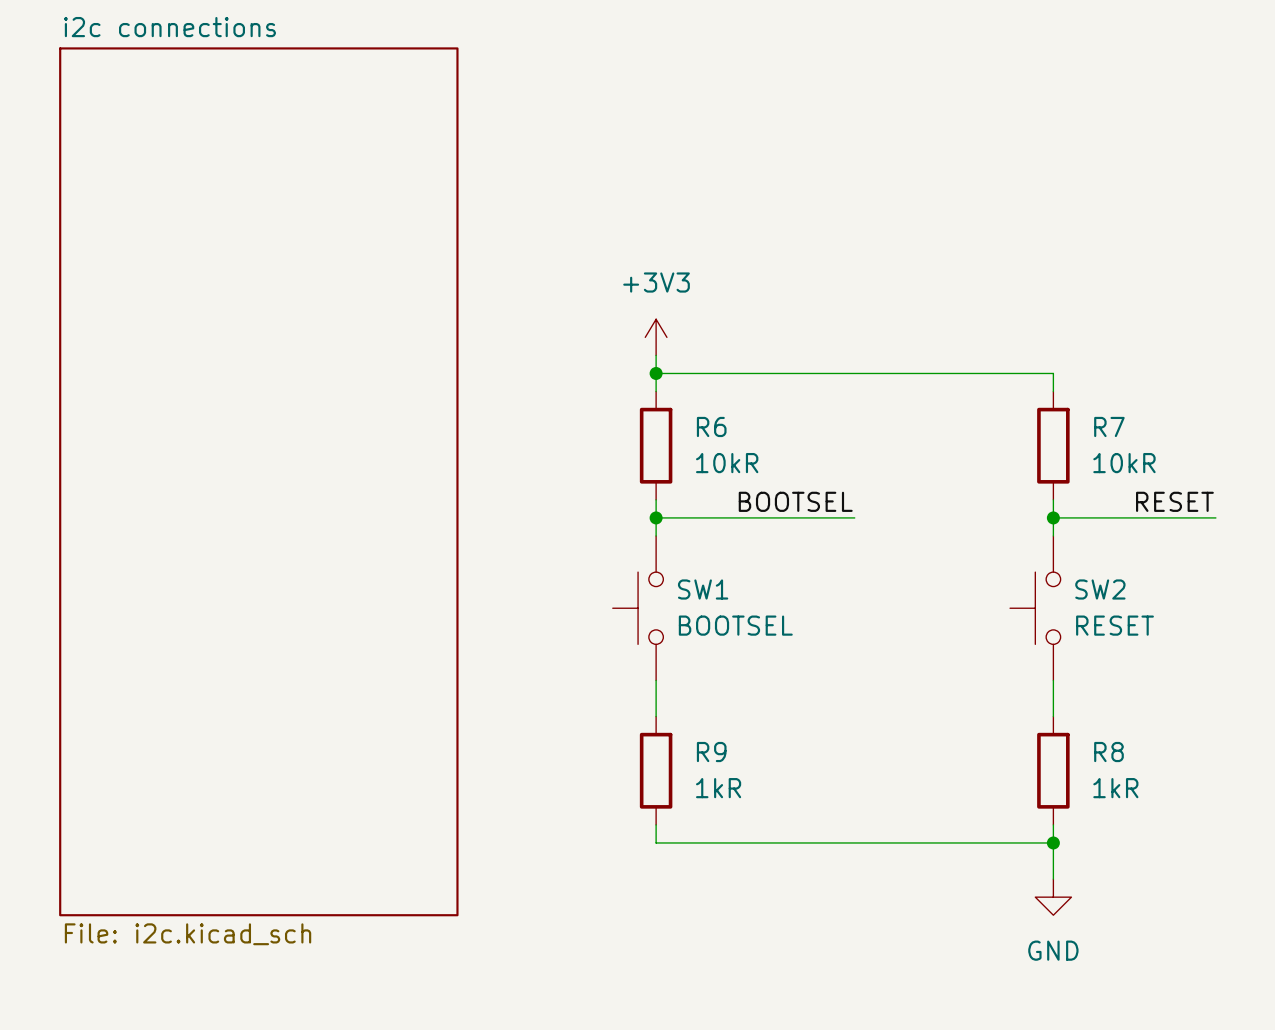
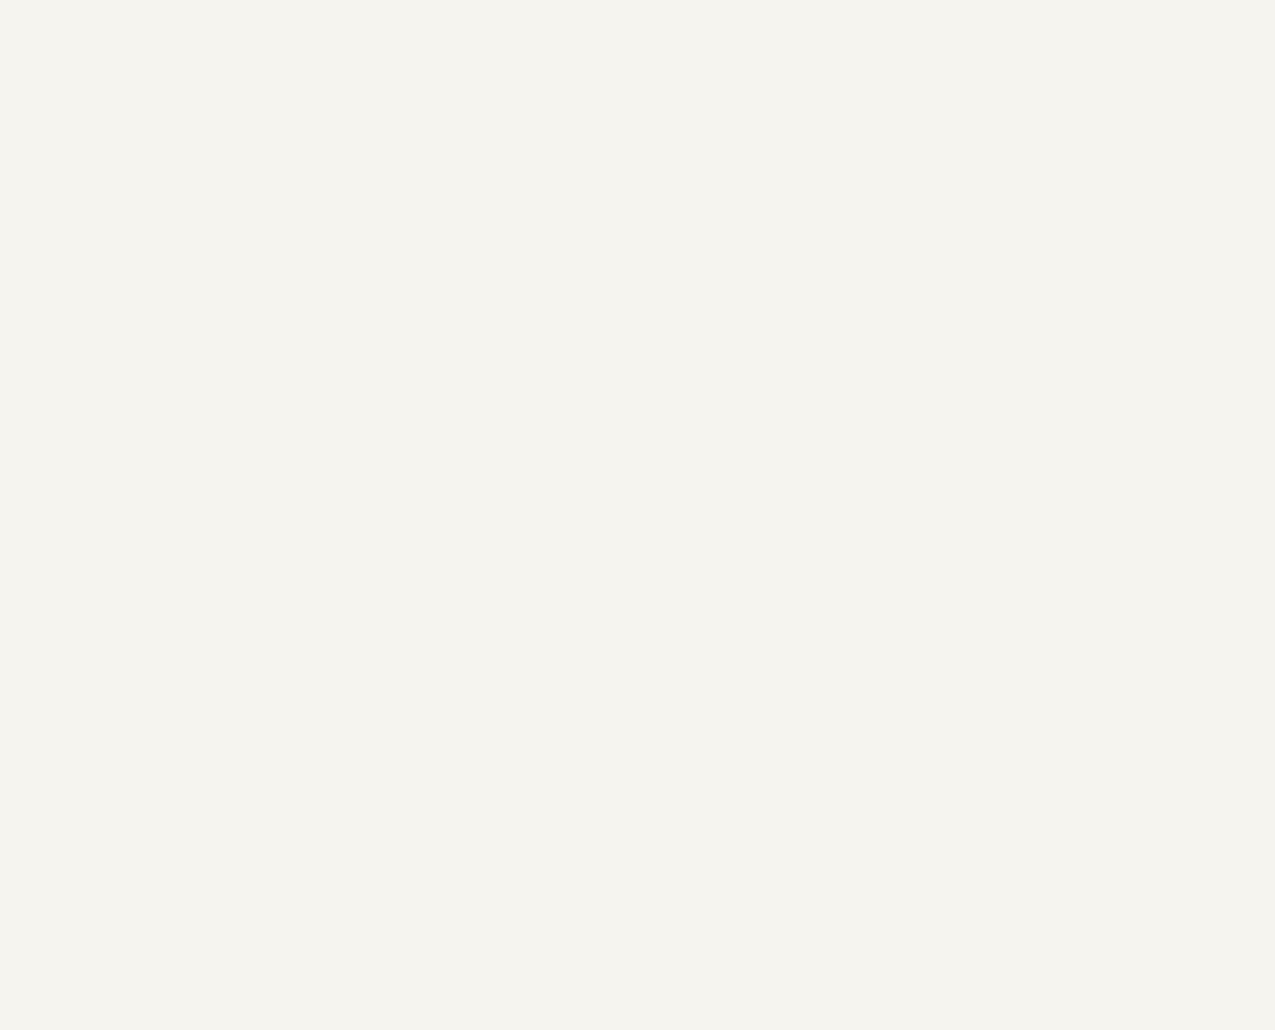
power symbol: +3V3 (656, 337) -> none
wire: (656, 355) (656, 391) -> none
wire: (656, 373) (1053, 373) (1053, 391) -> none
junction: (656, 373) -> none
R6: 10kR (656, 445) -> none
R7: 10kR (1053, 445) -> none
sheet i2c connections: File: i2c.kicad_sch (258, 481) -> none
wire: (656, 499) (656, 536) -> none
wire: (1053, 499) (1053, 536) -> none
label: BOOTSEL (795, 501) -> none
label: RESET (1174, 501) -> none
wire: (656, 517) (854, 517) -> none
junction: (656, 517) -> none
wire: (1053, 517) (1215, 517) -> none
junction: (1053, 517) -> none
SW1: BOOTSEL (638, 608) -> none
SW2: RESET (1035, 608) -> none
wire: (656, 680) (656, 716) -> none
wire: (1053, 680) (1053, 716) -> none
R9: 1kR (656, 770) -> none
R8: 1kR (1053, 770) -> none
wire: (656, 824) (656, 842) (1053, 842) -> none
wire: (1053, 824) (1053, 879) -> none
junction: (1053, 842) -> none
power symbol: GND (1053, 897) -> none

